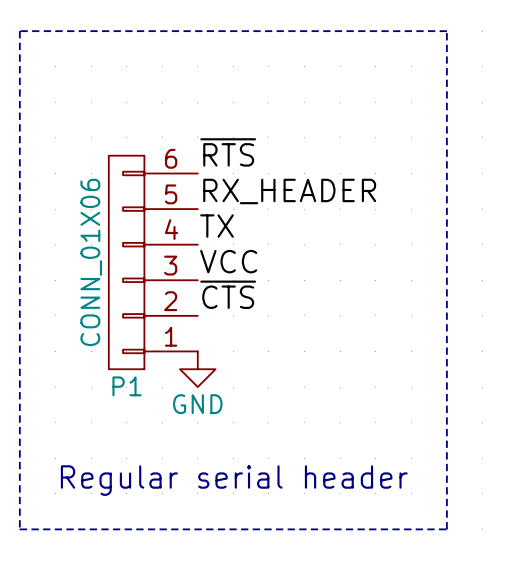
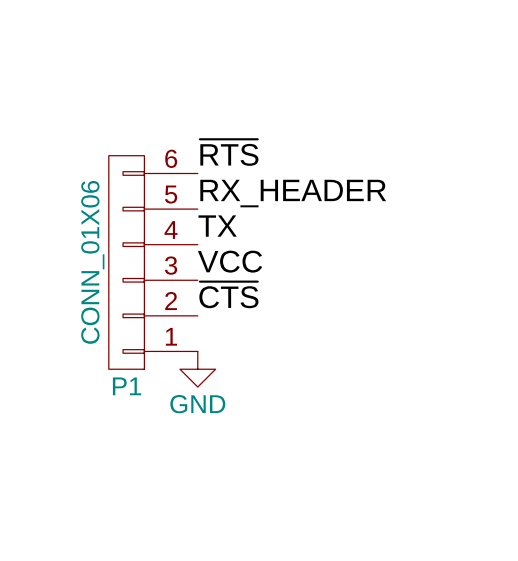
line: (19, 31) (19, 529) (446, 529) (446, 31) (19, 31) -> none
text: Regular serial header (234, 480) -> none

